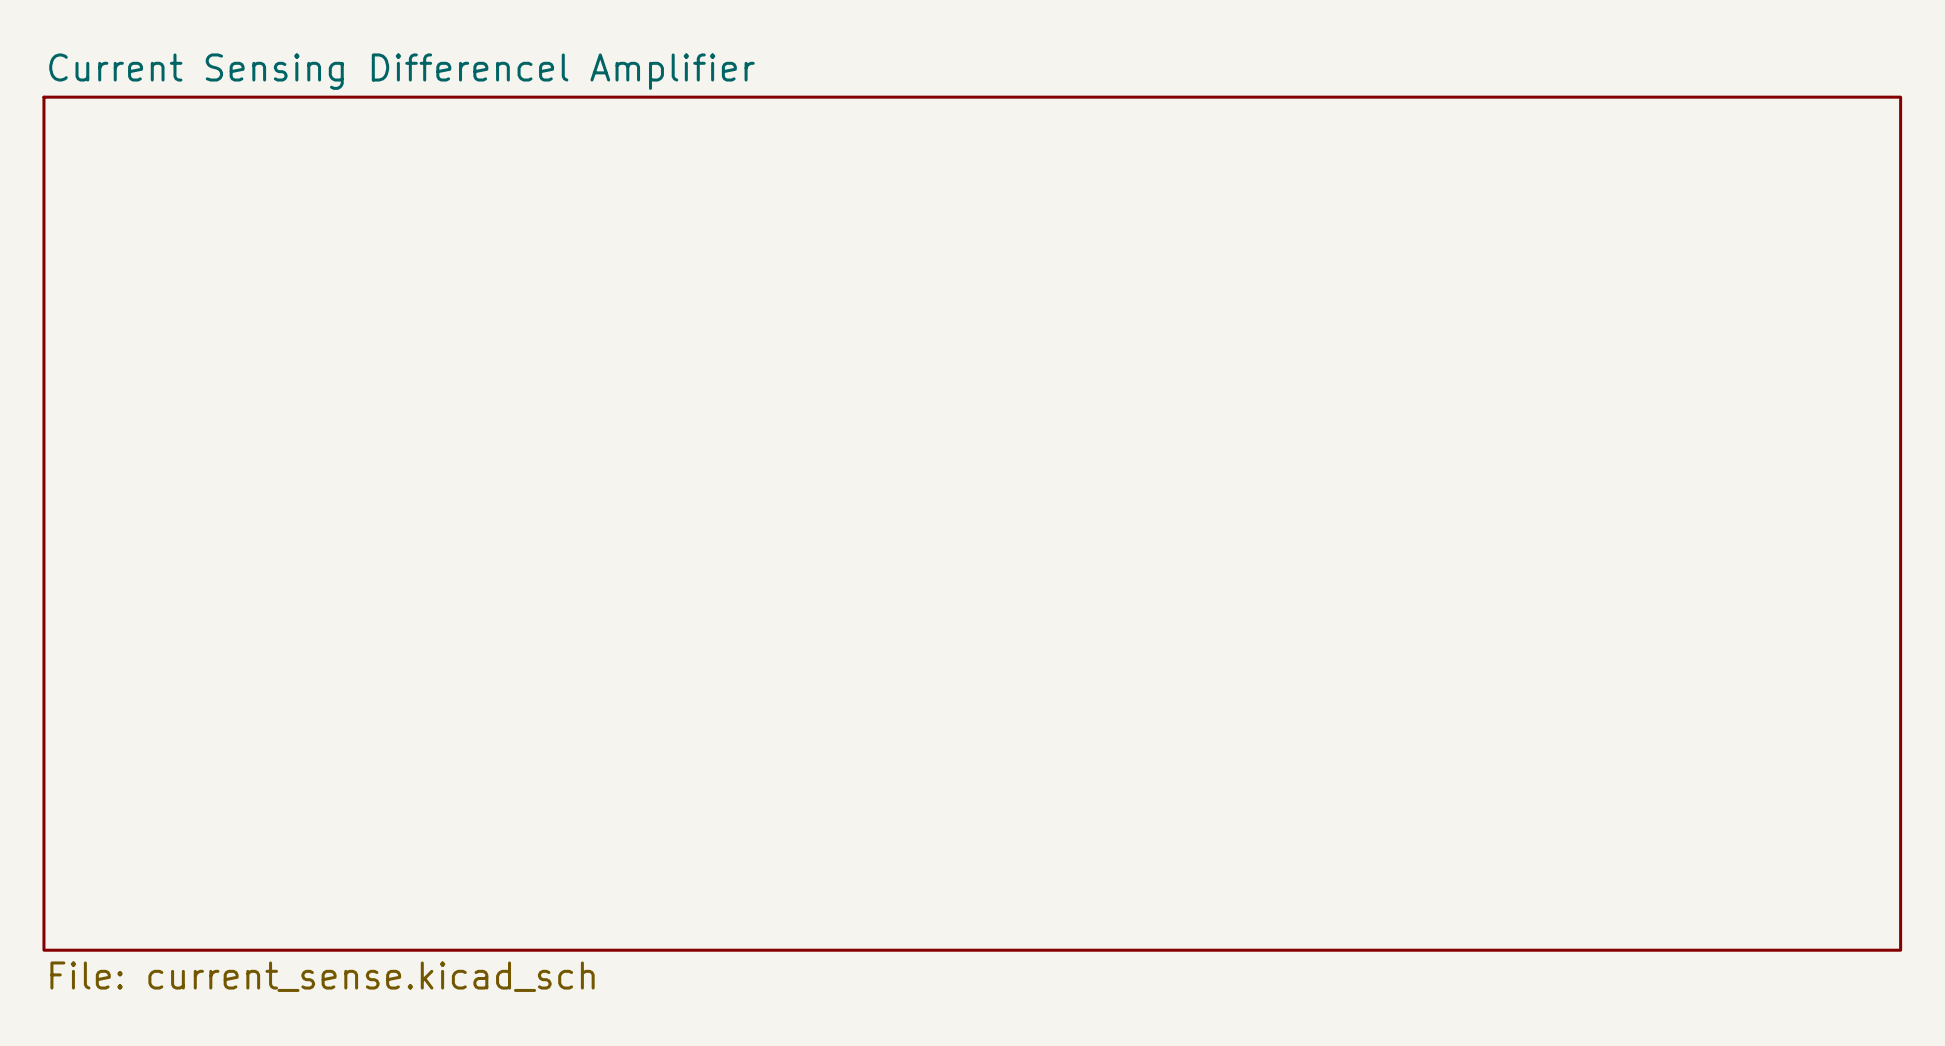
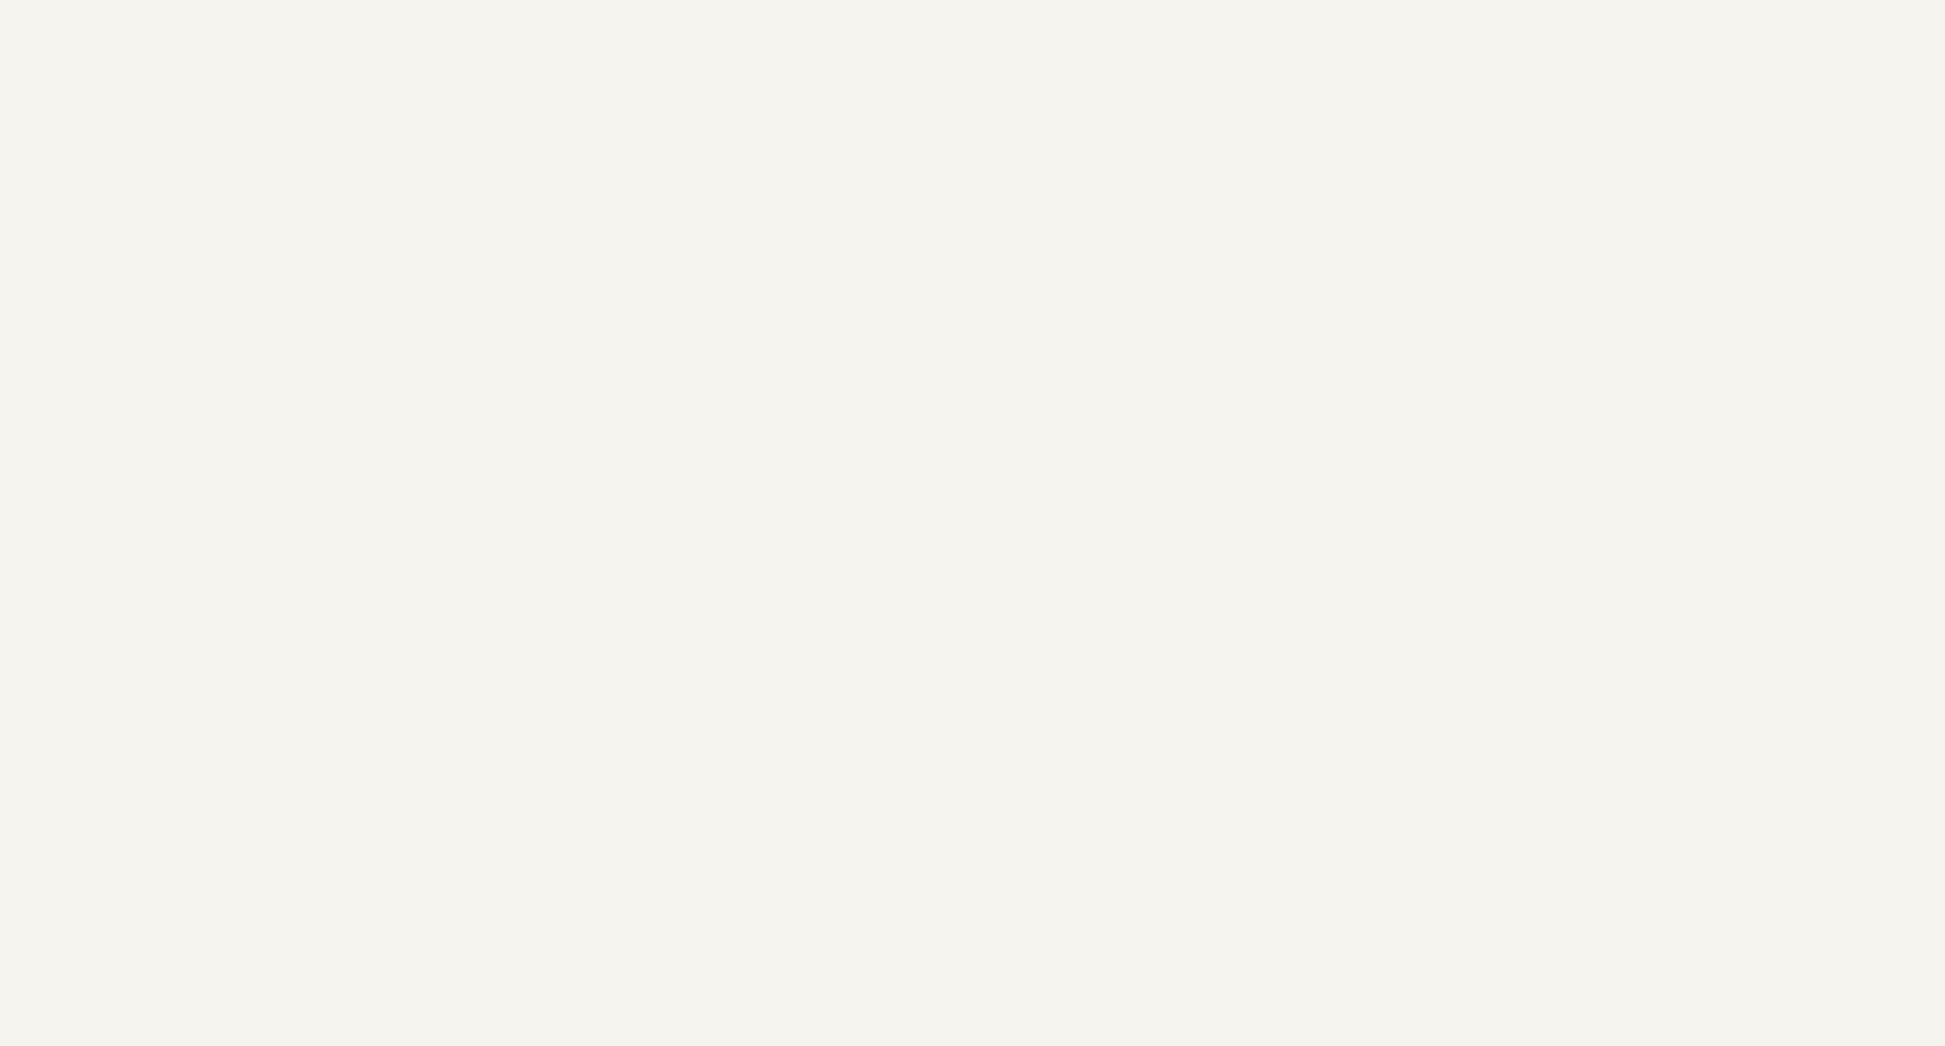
sheet Current Sensing Differencel Amplifier: File: current_sense.kicad_sch (972, 523) -> none

